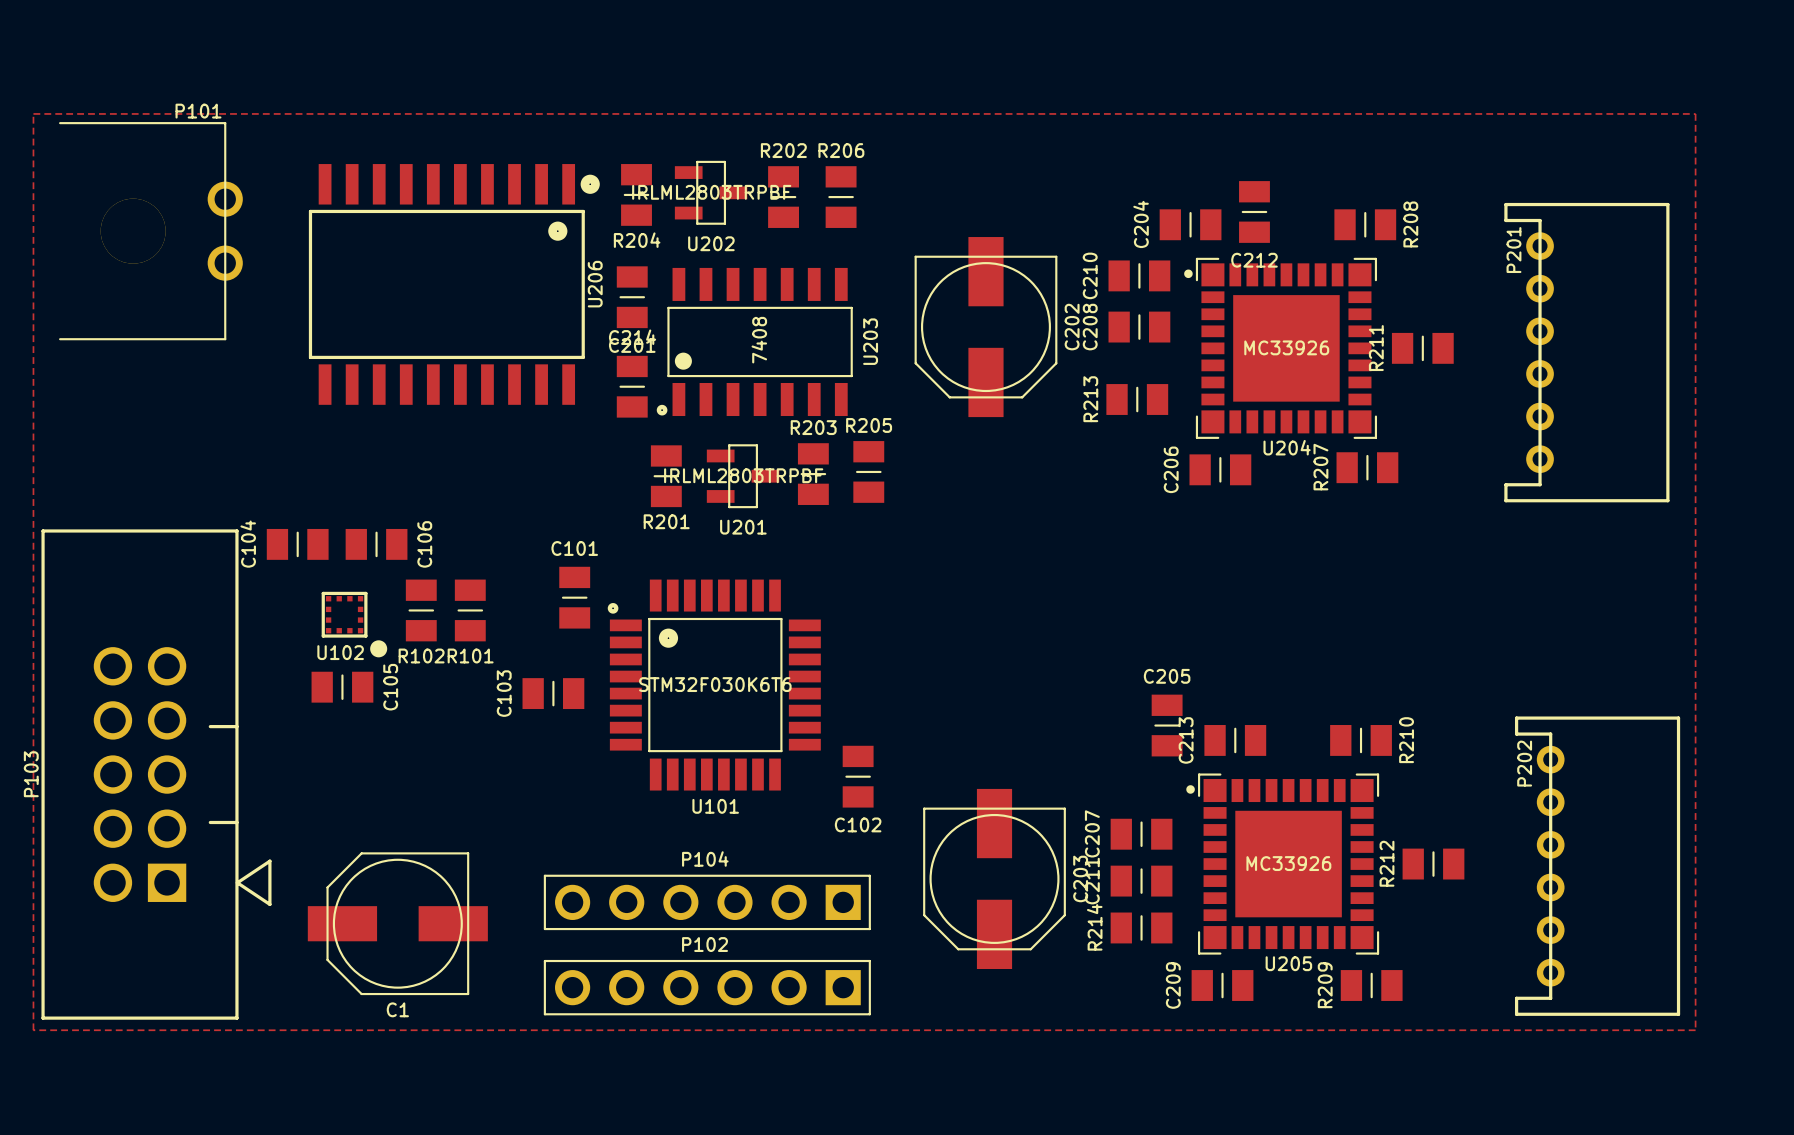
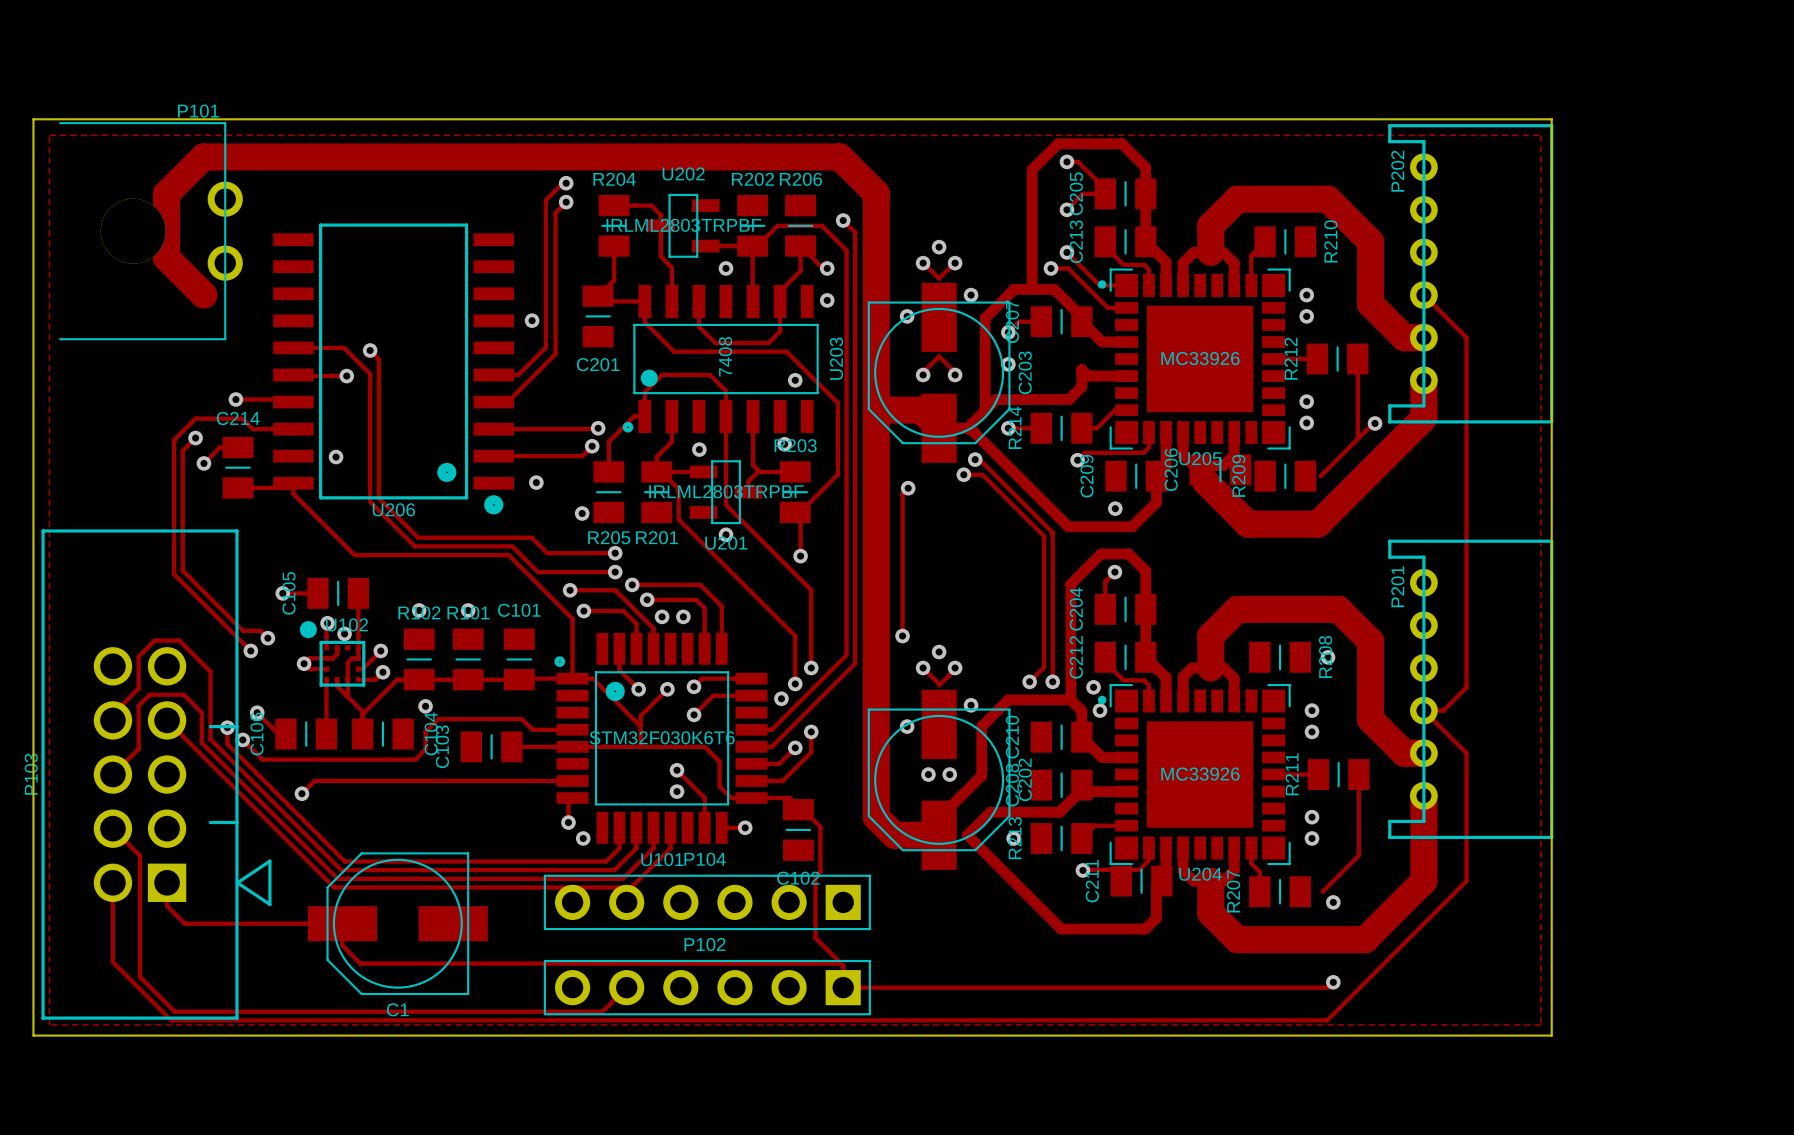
zone outline: (33, 113) (33, 1030) (1695, 1030) (1695, 113) (33, 113) -> (49, 135) (49, 1024) (1541, 1024) (1541, 135) (49, 135)
board edge: none -> (33, 119) (1551, 119) (1551, 1035) (33, 1035) (33, 119)
track: none -> (1066, 161) (1078, 161) (1105, 189) (1105, 193) (1082, 193) (1066, 209)
via: none -> (1066, 161)
track: none -> (566, 183) (562, 183) (545, 200) (545, 347) (518, 375) (493, 375)
via: none -> (566, 183)
U202 rotation: 0° (711, 192) -> 180° (683, 225)
R204 position: (636, 194) -> (614, 225)
R202 position: (783, 197) -> (752, 225)
R206 position: (841, 197) -> (800, 225)
track: none -> (566, 202) (555, 212) (555, 354) (507, 402) (493, 402)
via: none -> (566, 202)
track: none -> (614, 205) (651, 205) (661, 215) (661, 256) (671, 267) (671, 301)
via: none -> (1066, 209)
C212 rotation: 0° (1254, 211) -> 90° clockwise (1125, 657)
C212 position: (1254, 211) -> (1125, 657)
track: none -> (843, 220) (855, 232) (855, 663) (771, 746) (751, 746)
via: none -> (843, 220)
C204 position: (1190, 224) -> (1125, 609)
R208 position: (1365, 224) -> (1280, 657)
R204 name position: R204 (637, 240) -> R204 (614, 179)
track: none -> (1105, 241) (1105, 246) (1123, 264) (1144, 264) (1149, 269) (1149, 285)
track: none -> (1265, 241) (1251, 255) (1251, 285)
track: none -> (614, 246) (614, 280) (598, 296) (603, 301) (644, 301) (644, 322) (674, 351) (786, 351) (837, 402) (837, 474) (800, 512) (795, 512) (800, 517) (800, 556)
track: none -> (705, 246) (757, 246) (777, 225) (821, 225) (846, 250) (846, 655) (771, 729) (751, 729)
track: none -> (752, 246) (753, 301)
via: none -> (939, 247)
track: none -> (1066, 252) (1099, 285) (1126, 285)
via: none -> (1066, 252)
track: none -> (1210, 252) (1210, 225) (1237, 199) (1328, 199) (1370, 241) (1370, 304) (1404, 337) (1423, 337)
track: none -> (923, 263) (939, 278) (955, 263)
via: none -> (923, 263)
via: none -> (955, 263)
via: none -> (726, 268)
track: none -> (827, 268) (822, 268) (800, 246) (800, 270) (780, 291) (780, 331) (768, 343) (715, 343) (698, 326) (698, 301)
via: none -> (827, 268)
track: none -> (1050, 268) (1068, 268) (1107, 307) (1126, 307)
via: none -> (1050, 268)
C210 position: (1139, 275) -> (1061, 737)
U206 rotation: 0° (454, 284) -> 90° clockwise (393, 368)
track: none -> (1166, 285) (1166, 262) (1145, 241) (1145, 167) (1121, 143) (1058, 143) (1032, 169) (1032, 289)
track: none -> (1183, 285) (1183, 263) (1193, 252) (1223, 252) (1234, 263) (1234, 285)
track: none -> (203, 295) (166, 257) (166, 193) (203, 156) (839, 156) (876, 193) (876, 817) (894, 835) (939, 835) (939, 818) (981, 775) (981, 726) (1008, 699) (1070, 699)
via: none -> (971, 295)
via: none -> (1306, 295)
track: none -> (1423, 295) (1466, 337) (1466, 687) (1443, 710) (1423, 710) (1466, 753) (1466, 881) (1327, 1020) (171, 1020) (112, 962) (112, 882)
C201 position: (632, 297) -> (598, 316)
via: none -> (827, 300)
via: none -> (907, 316)
via: none -> (1306, 316)
via: none -> (532, 320)
track: none -> (1041, 321) (1019, 321) (1008, 332)
C202 position: (985, 327) -> (939, 779)
C208 position: (1139, 327) -> (1061, 785)
via: none -> (1008, 332)
U203 position: (754, 341) -> (720, 359)
track: none -> (1126, 341) (1102, 341) (1081, 321) (1081, 316) (1054, 289) (1014, 289) (985, 318) (985, 410)
track: none -> (293, 347) (344, 347) (370, 373) (370, 501) (414, 546) (512, 546) (537, 572) (615, 572)
U204 position: (1280, 348) -> (1194, 774)
R211 position: (1422, 348) -> (1338, 774)
track: none -> (370, 350) (378, 359) (378, 498) (418, 537) (531, 537) (547, 553) (615, 553)
via: none -> (370, 350)
P201 position: (1586, 352) -> (1470, 689)
track: none -> (1273, 359) (1317, 359)
track: none -> (1357, 359) (1357, 438)
via: none -> (1008, 364)
track: none -> (293, 375) (346, 376)
track: none -> (923, 375) (923, 372) (939, 356) (955, 372) (955, 375)
via: none -> (923, 375)
via: none -> (955, 375)
via: none -> (346, 376)
track: none -> (1126, 376) (1088, 376) (1081, 369) (1081, 386) (1069, 399) (996, 399) (967, 428)
via: none -> (795, 380)
track: none -> (1423, 380) (1423, 418) (1317, 524) (1248, 524) (1205, 481)
C214 position: (632, 386) -> (238, 467)
track: none -> (235, 399) (290, 399) (293, 402)
via: none -> (235, 399)
R213 position: (1137, 399) -> (1061, 838)
via: none -> (1306, 401)
track: none -> (876, 410) (920, 410) (939, 428) (969, 428) (1068, 526) (1132, 526) (1156, 502) (1156, 476) (1166, 466) (1166, 432)
track: none -> (1126, 410) (1114, 410) (1096, 428) (1081, 428)
track: none -> (671, 416) (671, 441) (656, 456) (656, 471) (703, 471)
track: none -> (753, 416) (753, 464) (760, 471) (795, 471)
via: none -> (1306, 422)
track: none -> (1373, 423) (1320, 476)
via: none -> (1375, 423)
R205 name position: R205 (869, 425) -> R205 (609, 537)
track: none -> (598, 428) (493, 429)
via: none -> (598, 428)
track: none -> (1008, 428) (1041, 428)
via: none -> (1008, 428)
track: none -> (293, 429) (252, 429) (242, 418) (195, 418) (174, 439) (174, 574) (250, 650)
track: none -> (1149, 432) (1149, 447) (1143, 452) (1085, 452) (1077, 460)
track: none -> (1183, 432) (1183, 454) (1193, 465) (1223, 465) (1234, 454) (1234, 432)
track: none -> (195, 438) (182, 450) (182, 570) (242, 630) (260, 630) (267, 638)
via: none -> (195, 438)
via: none -> (784, 444)
track: none -> (592, 446) (582, 456) (493, 456)
via: none -> (592, 446)
track: none -> (238, 447) (219, 447) (203, 463)
via: none -> (699, 449)
via: none -> (336, 457)
track: none -> (975, 459) (978, 458) (1052, 532) (1052, 681)
via: none -> (975, 459)
via: none -> (1077, 460)
via: none -> (203, 463)
R207 position: (1367, 467) -> (1280, 891)
track: none -> (758, 470) (748, 481) (748, 492)
track: none -> (608, 471) (608, 441) (634, 416) (644, 416) (644, 392) (662, 375) (710, 375) (726, 390) (726, 504) (811, 590) (811, 668)
track: none -> (661, 471) (678, 489) (678, 519) (795, 636) (795, 683)
R205 position: (868, 471) -> (608, 492)
R203 position: (813, 474) -> (795, 492)
track: none -> (963, 474) (982, 474) (1044, 536) (1044, 667) (1029, 681)
via: none -> (963, 474)
R201 position: (666, 476) -> (656, 492)
U201 position: (743, 476) -> (726, 492)
via: none -> (536, 482)
track: none -> (238, 487) (288, 487) (293, 483) (293, 493) (354, 555) (508, 555) (572, 618) (572, 678)
track: none -> (908, 488) (902, 493) (902, 636)
via: none -> (908, 488)
via: none -> (1115, 508)
via: none -> (582, 513)
via: none -> (726, 534)
C104 name position: C104 (248, 544) -> C104 (431, 733)
C104 position: (297, 544) -> (382, 734)
C106 position: (376, 544) -> (306, 734)
C106 name position: C106 (424, 544) -> C106 (257, 734)
via: none -> (615, 553)
via: none -> (800, 556)
via: none -> (615, 572)
track: none -> (1114, 572) (1105, 581) (1105, 609)
via: none -> (1114, 572)
track: none -> (632, 584) (700, 584) (721, 606) (721, 648)
via: none -> (632, 584)
track: none -> (570, 590) (615, 590) (653, 628) (653, 648)
via: none -> (570, 590)
track: none -> (282, 593) (317, 593)
via: none -> (282, 593)
track: none -> (358, 593) (358, 658) (352, 658) (347, 662) (347, 696)
C101 position: (574, 597) -> (519, 659)
track: none -> (647, 599) (696, 599) (704, 608) (704, 648)
via: none -> (647, 599)
via: none -> (419, 610)
R102 position: (421, 610) -> (419, 659)
via: none -> (468, 610)
R101 position: (470, 610) -> (468, 659)
track: none -> (583, 611) (623, 611) (636, 623) (636, 648)
via: none -> (583, 611)
via: none -> (662, 616)
via: none -> (683, 616)
track: none -> (327, 623) (326, 647)
via: none -> (327, 623)
U102 rotation: 0° (354, 624) -> 180° (332, 653)
via: none -> (344, 633)
via: none -> (902, 636)
via: none -> (267, 638)
track: none -> (337, 647) (337, 654) (332, 658) (309, 658) (304, 663) (309, 669) (326, 669)
track: none -> (619, 648) (619, 670) (638, 689)
via: none -> (250, 650)
track: none -> (380, 650) (362, 669) (358, 669)
via: none -> (380, 650)
via: none -> (939, 652)
R102 name position: R102 (421, 655) -> R102 (419, 612)
R101 name position: R101 (470, 655) -> R101 (468, 612)
track: none -> (1105, 657) (1105, 662) (1123, 680) (1144, 680) (1149, 685) (1149, 701)
via: none -> (1328, 657)
via: none -> (304, 663)
via: none -> (811, 668)
track: none -> (923, 668) (939, 683)
via: none -> (923, 668)
track: none -> (955, 668) (939, 685)
via: none -> (955, 668)
track: none -> (1210, 668) (1210, 636) (1237, 609) (1338, 609) (1370, 641) (1370, 719) (1404, 753) (1423, 753)
track: none -> (382, 672) (375, 679) (358, 679)
via: none -> (382, 672)
C205 name position: C205 (1167, 676) -> C205 (1076, 193)
track: none -> (751, 678) (702, 678) (694, 686)
track: none -> (326, 679) (326, 734)
track: none -> (337, 679) (337, 686) (362, 711) (362, 734)
via: none -> (1029, 681)
via: none -> (1052, 681)
via: none -> (795, 683)
U101 position: (714, 685) -> (661, 738)
via: none -> (694, 686)
C105 position: (342, 687) -> (338, 593)
C105 name position: C105 (390, 687) -> C105 (288, 593)
via: none -> (1093, 687)
via: none -> (638, 689)
track: none -> (667, 689) (640, 715) (640, 746)
via: none -> (667, 689)
C103 position: (553, 693) -> (491, 746)
track: none -> (751, 695) (713, 695) (694, 714)
via: none -> (781, 698)
track: none -> (1070, 699) (1070, 584) (1101, 553) (1128, 553) (1145, 571) (1145, 657) (1166, 677) (1166, 701)
track: none -> (1070, 699) (1081, 710) (1081, 737) (1102, 757) (1126, 757)
track: none -> (1183, 700) (1183, 676) (1192, 668) (1223, 668) (1234, 678) (1234, 701)
via: none -> (971, 705)
via: none -> (425, 706)
via: none -> (1100, 710)
via: none -> (1312, 710)
track: none -> (257, 712) (278, 734) (285, 734)
via: none -> (257, 712)
track: none -> (362, 714) (397, 679) (592, 678) (640, 726)
via: none -> (694, 714)
track: none -> (112, 720) (112, 714) (138, 688) (138, 656) (154, 640) (179, 640) (210, 671) (210, 739) (341, 870) (614, 870) (636, 848) (636, 827)
track: none -> (167, 720) (334, 887) (631, 887) (670, 848) (670, 827)
C205 rotation: 0° (1167, 725) -> 90° clockwise (1125, 193)
C205 position: (1167, 725) -> (1125, 193)
via: none -> (907, 726)
track: none -> (227, 727) (227, 743) (344, 861) (606, 861) (619, 848) (619, 827)
via: none -> (227, 727)
track: none -> (572, 729) (532, 729) (521, 719) (438, 719) (425, 731) (425, 749) (415, 759) (262, 759) (242, 739)
track: none -> (811, 731) (811, 752) (782, 780) (751, 780)
via: none -> (811, 731)
via: none -> (1312, 731)
via: none -> (242, 739)
C213 position: (1235, 740) -> (1125, 241)
R210 position: (1361, 740) -> (1285, 241)
track: none -> (511, 746) (704, 746) (719, 761) (719, 786) (731, 797) (789, 797) (798, 806) (798, 809) (803, 809) (820, 826) (820, 871) (815, 876) (815, 938) (843, 965) (843, 987) (1328, 987) (1333, 982)
track: none -> (795, 747) (779, 763) (751, 763)
via: none -> (795, 747)
track: none -> (677, 770) (704, 797) (704, 827)
via: none -> (677, 770)
track: none -> (112, 774) (138, 748) (138, 705) (149, 694) (183, 694) (201, 712) (201, 742) (337, 878) (622, 878) (653, 848) (653, 827)
via: none -> (928, 774)
via: none -> (949, 774)
track: none -> (1273, 774) (1318, 774)
track: none -> (1358, 774) (1358, 855) (1322, 891)
C102 position: (858, 776) -> (798, 829)
track: none -> (572, 780) (314, 780) (301, 793)
via: none -> (677, 791)
track: none -> (1126, 791) (1088, 791) (1081, 785) (1081, 790) (1059, 812) (990, 812) (967, 835) (1061, 929) (1145, 929) (1156, 918) (1156, 891) (1166, 882) (1166, 848)
via: none -> (301, 793)
track: none -> (1423, 795) (1423, 881) (1365, 939) (1237, 939) (1210, 913) (1210, 881)
track: none -> (572, 797) (568, 802) (568, 822)
via: none -> (1312, 817)
via: none -> (568, 822)
track: none -> (1126, 825) (1094, 825) (1081, 838)
track: none -> (721, 827) (745, 827)
via: none -> (745, 827)
track: none -> (112, 828) (140, 855) (140, 976) (174, 1011) (602, 1011) (626, 987)
C207 position: (1141, 834) -> (1061, 321)
via: none -> (583, 838)
via: none -> (1013, 838)
via: none -> (1312, 838)
track: none -> (1149, 848) (1149, 860) (1139, 869) (1082, 870)
track: none -> (1183, 848) (1183, 870) (1193, 881) (1223, 881) (1234, 870) (1234, 848)
track: none -> (1251, 848) (1251, 863) (1259, 871) (1259, 891)
U205 position: (1282, 864) -> (1194, 359)
R212 position: (1433, 864) -> (1337, 359)
P202 position: (1597, 866) -> (1470, 273)
via: none -> (1082, 870)
C203 position: (994, 878) -> (939, 372)
track: none -> (167, 882) (167, 906) (184, 923) (342, 923) (342, 945) (361, 964) (841, 963)
via: none -> (1333, 902)
R214 position: (1141, 927) -> (1061, 428)
via: none -> (1333, 982)
C209 position: (1222, 985) -> (1136, 476)
R209 position: (1371, 985) -> (1285, 476)

